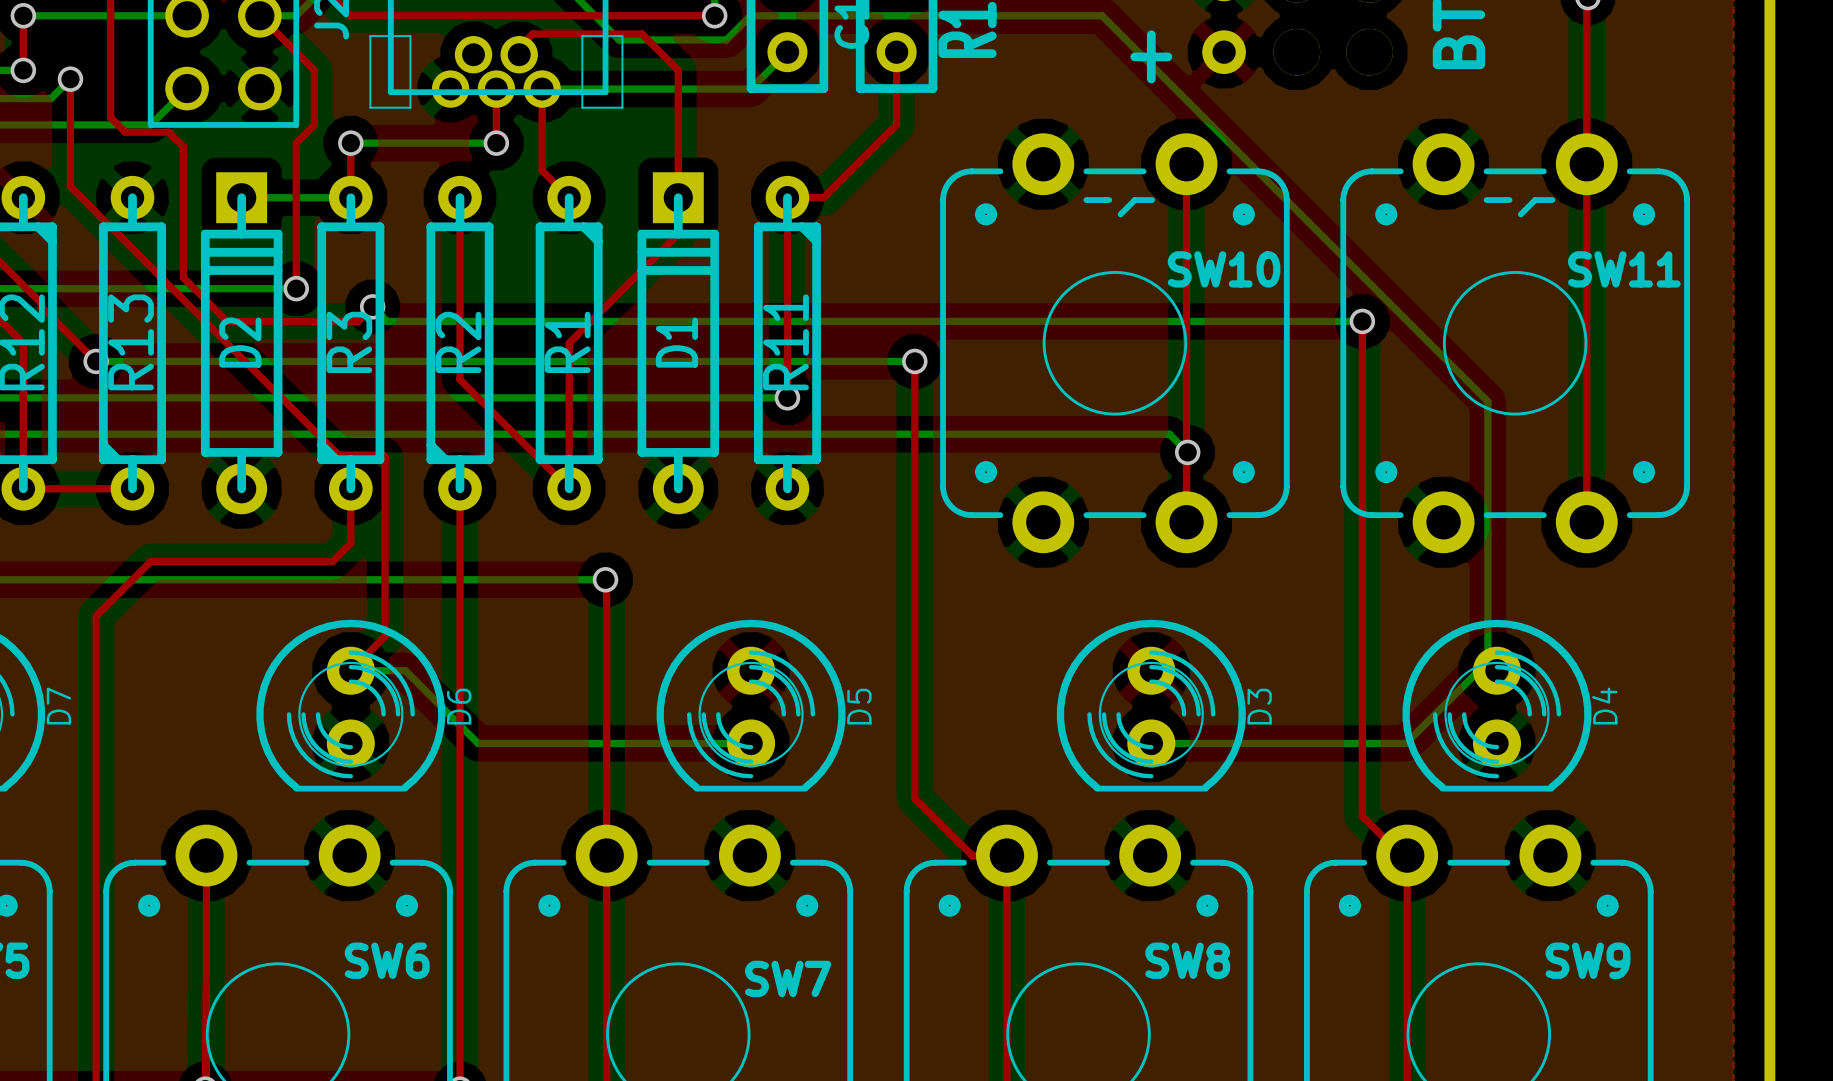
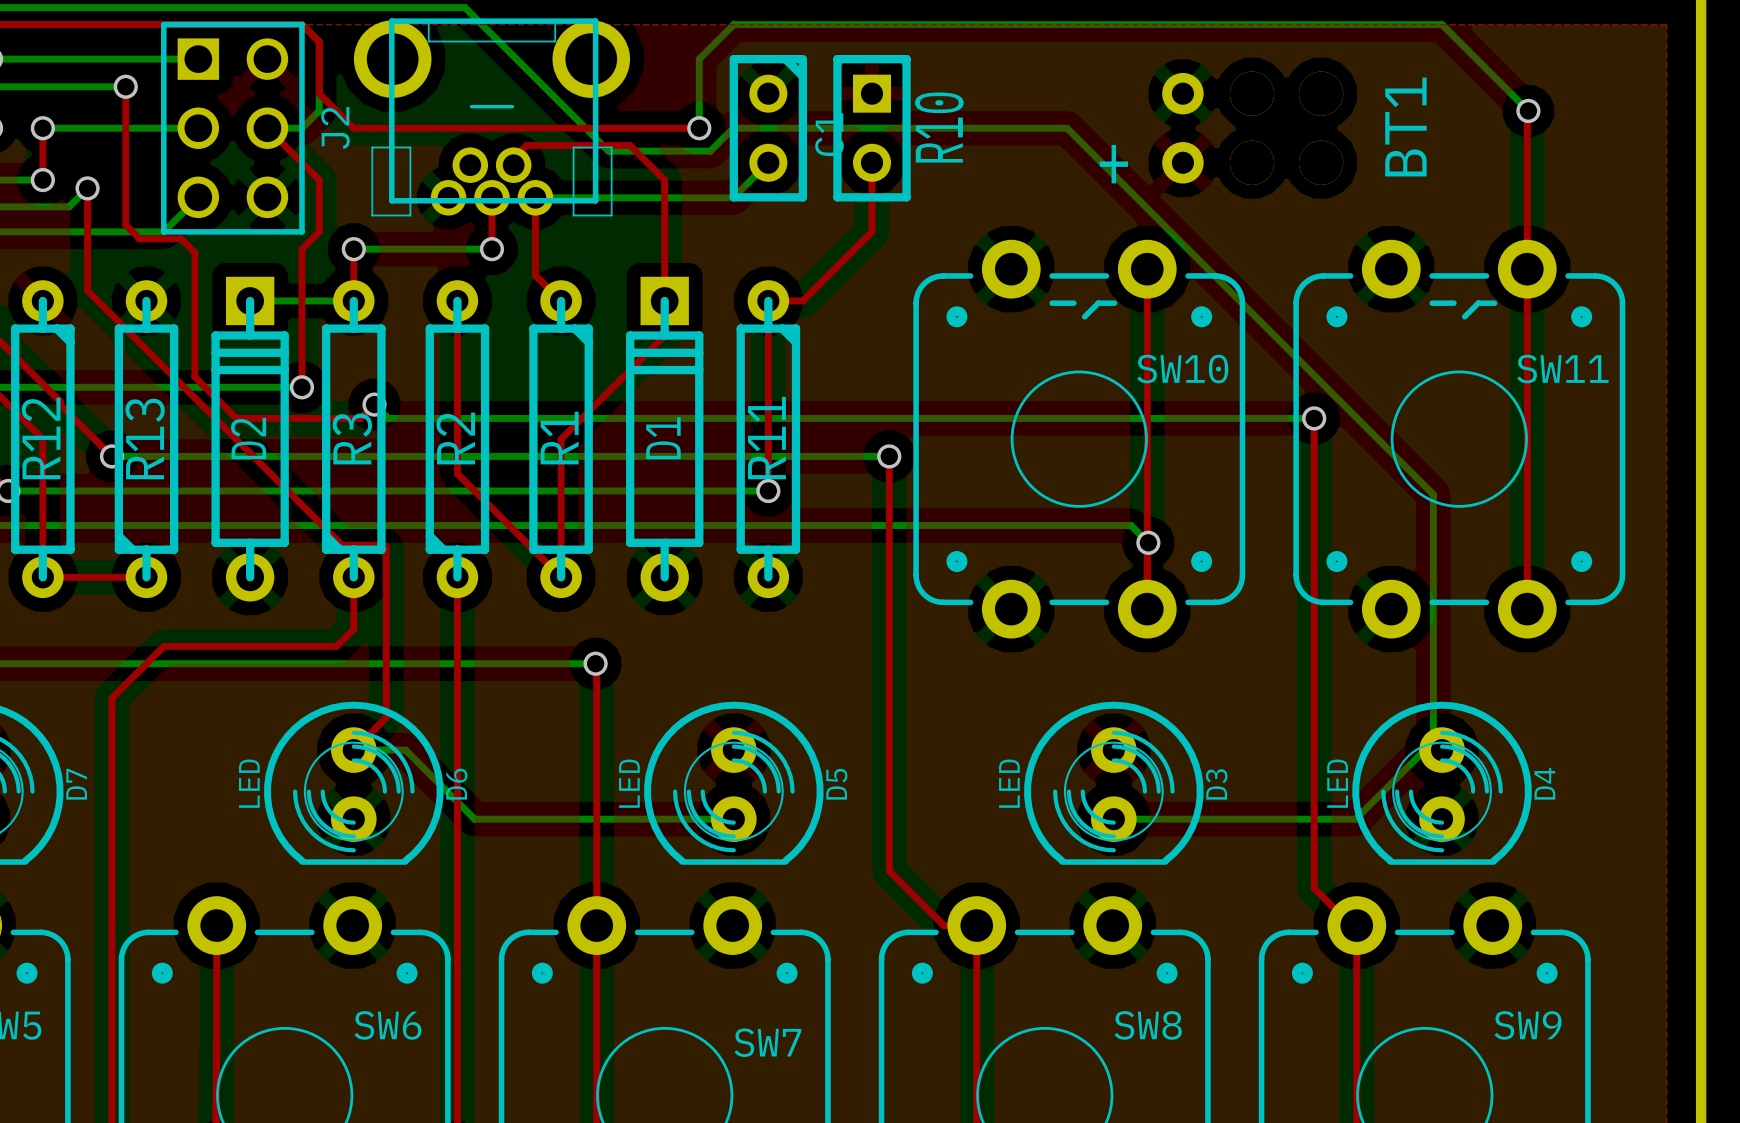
D6 value: none -> LED (249, 783)
D5 value: none -> LED (629, 783)
D3 value: none -> LED (1009, 783)
D4 value: none -> LED (1337, 783)

